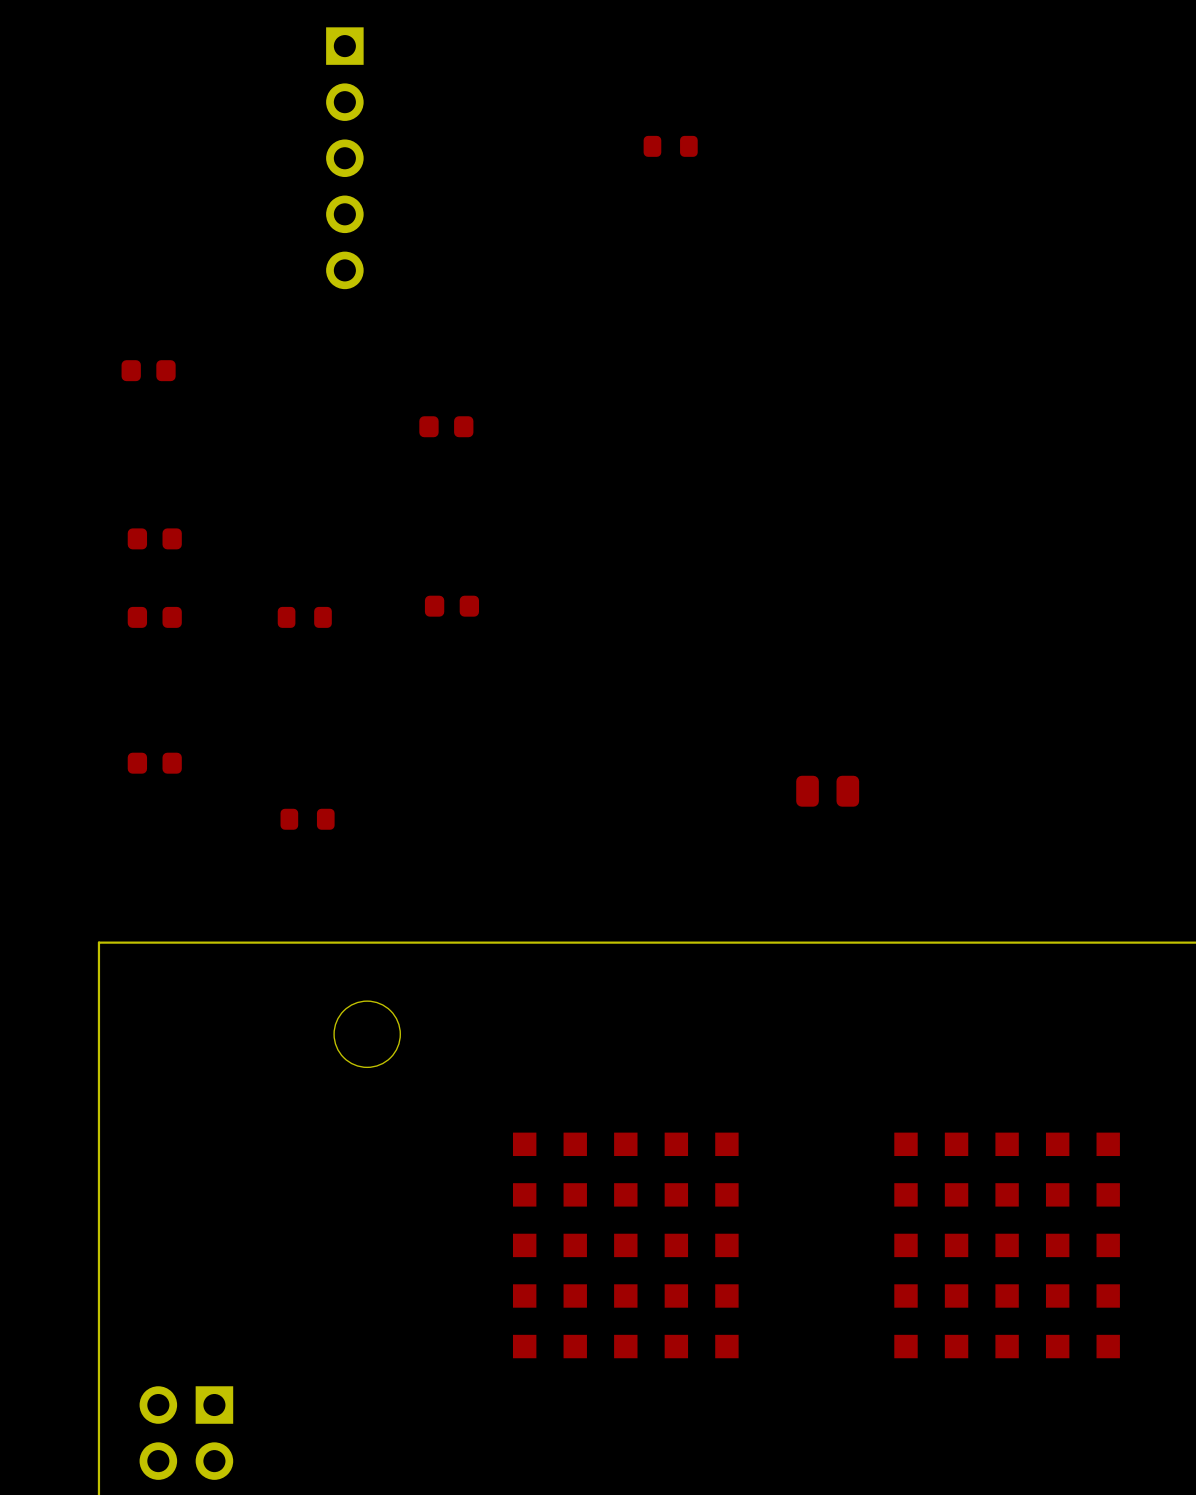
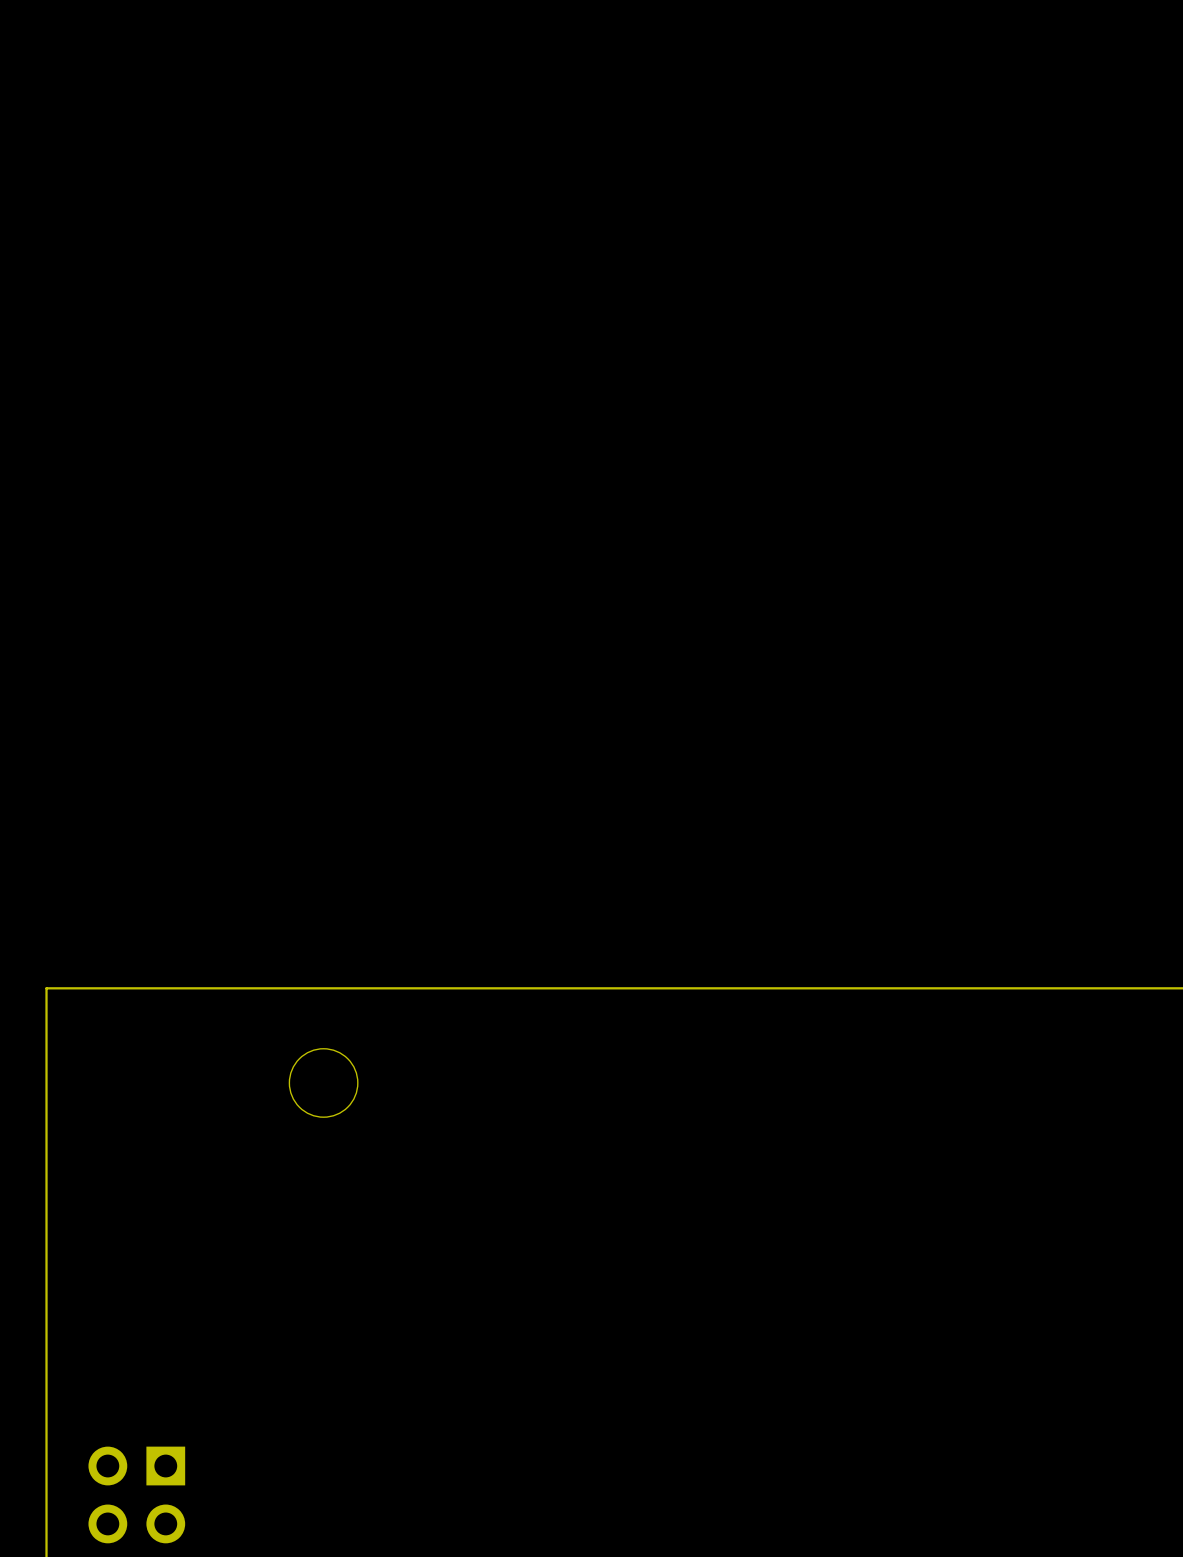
part: (670, 146) -> none
part: (344, 158) -> none
part: (148, 370) -> none
part: (446, 426) -> none
part: (154, 538) -> none
part: (451, 606) -> none
part: (154, 617) -> none
part: (304, 617) -> none
part: (154, 763) -> none
part: (827, 791) -> none
part: (307, 819) -> none
part: (625, 1245) -> none
part: (1007, 1245) -> none

